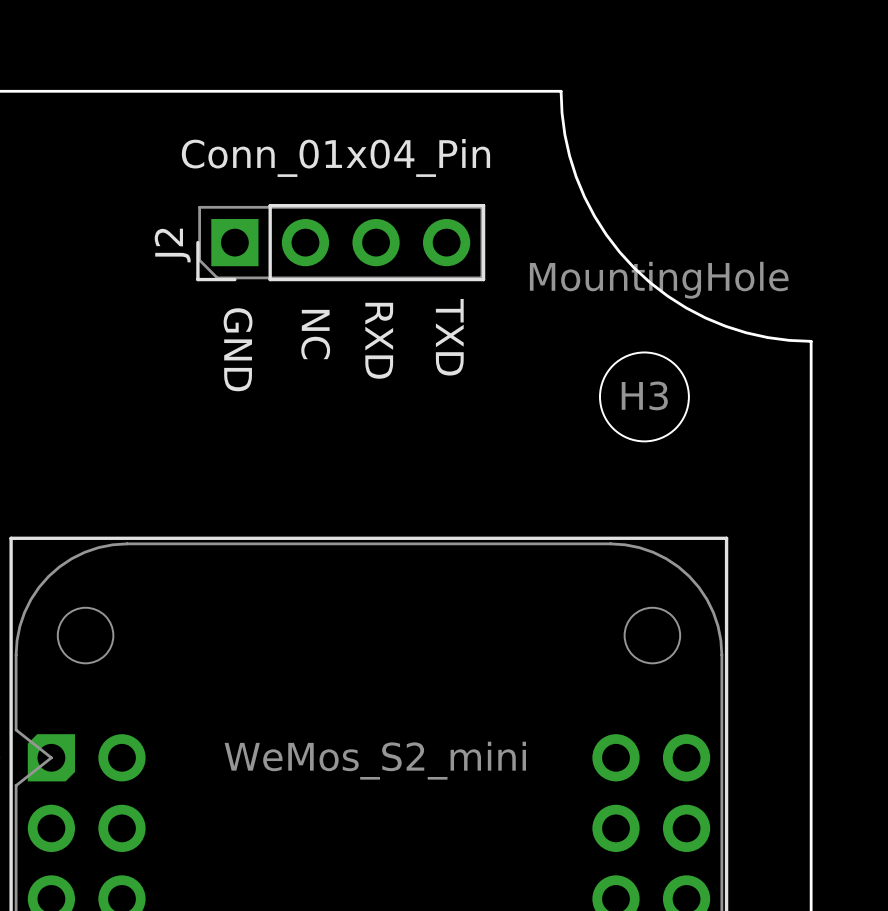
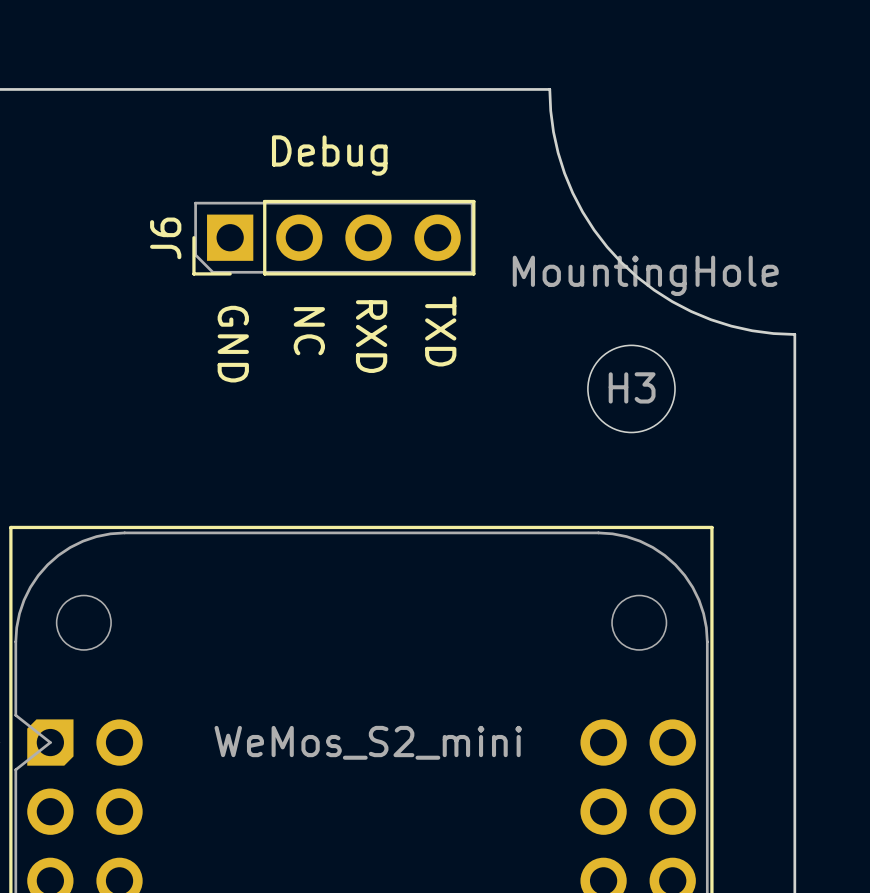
J2 value: Conn_01x04_Pin (335, 157) -> Debug (329, 155)
J2 name: J2 (172, 245) -> J6 (165, 238)

